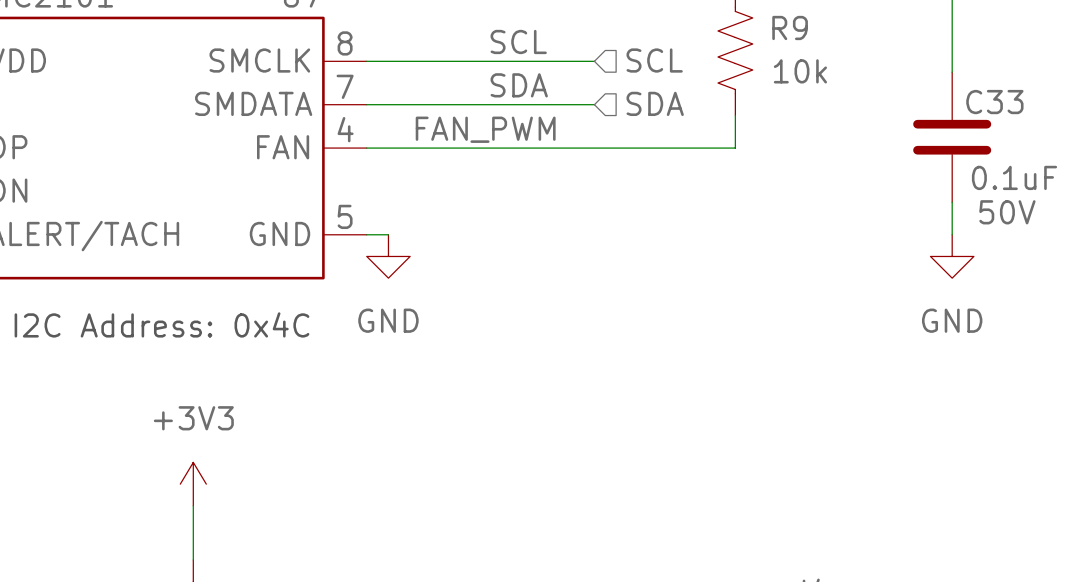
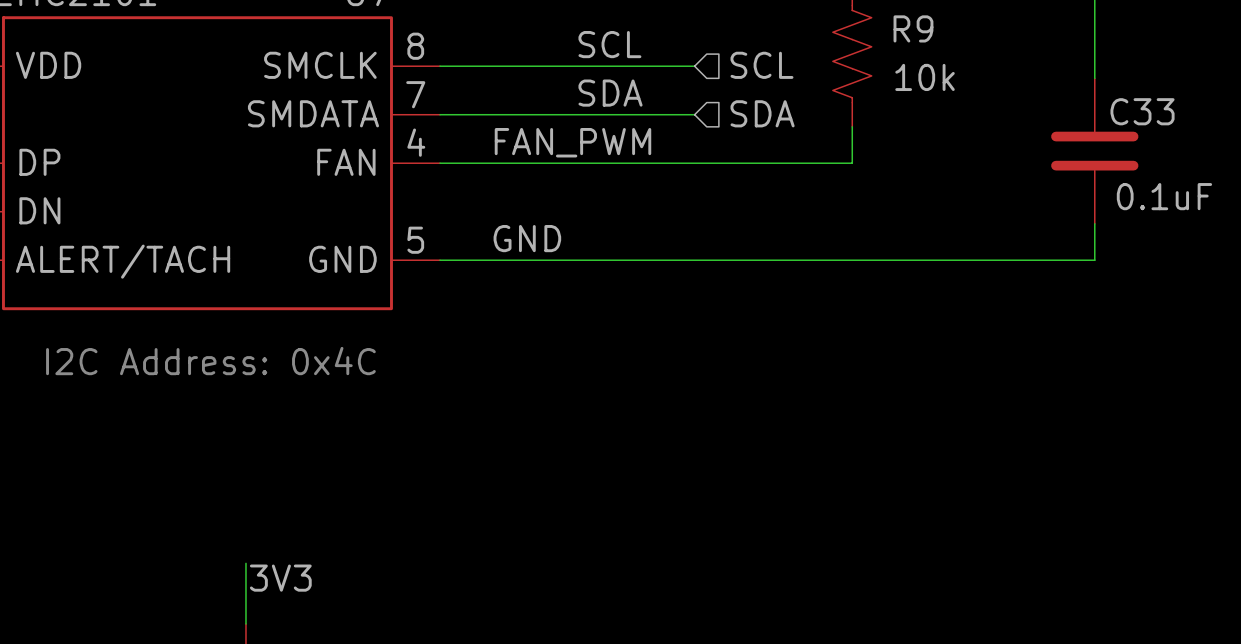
C33 text: 50V (1007, 212) -> none
label: none -> GND (527, 238)
wire: none -> (464, 260) (1094, 260)
power symbol: GND (388, 256) -> none
power symbol: GND (952, 256) -> none
power symbol: +3V3 (193, 484) -> none
label: none -> 3V3 (280, 578)

